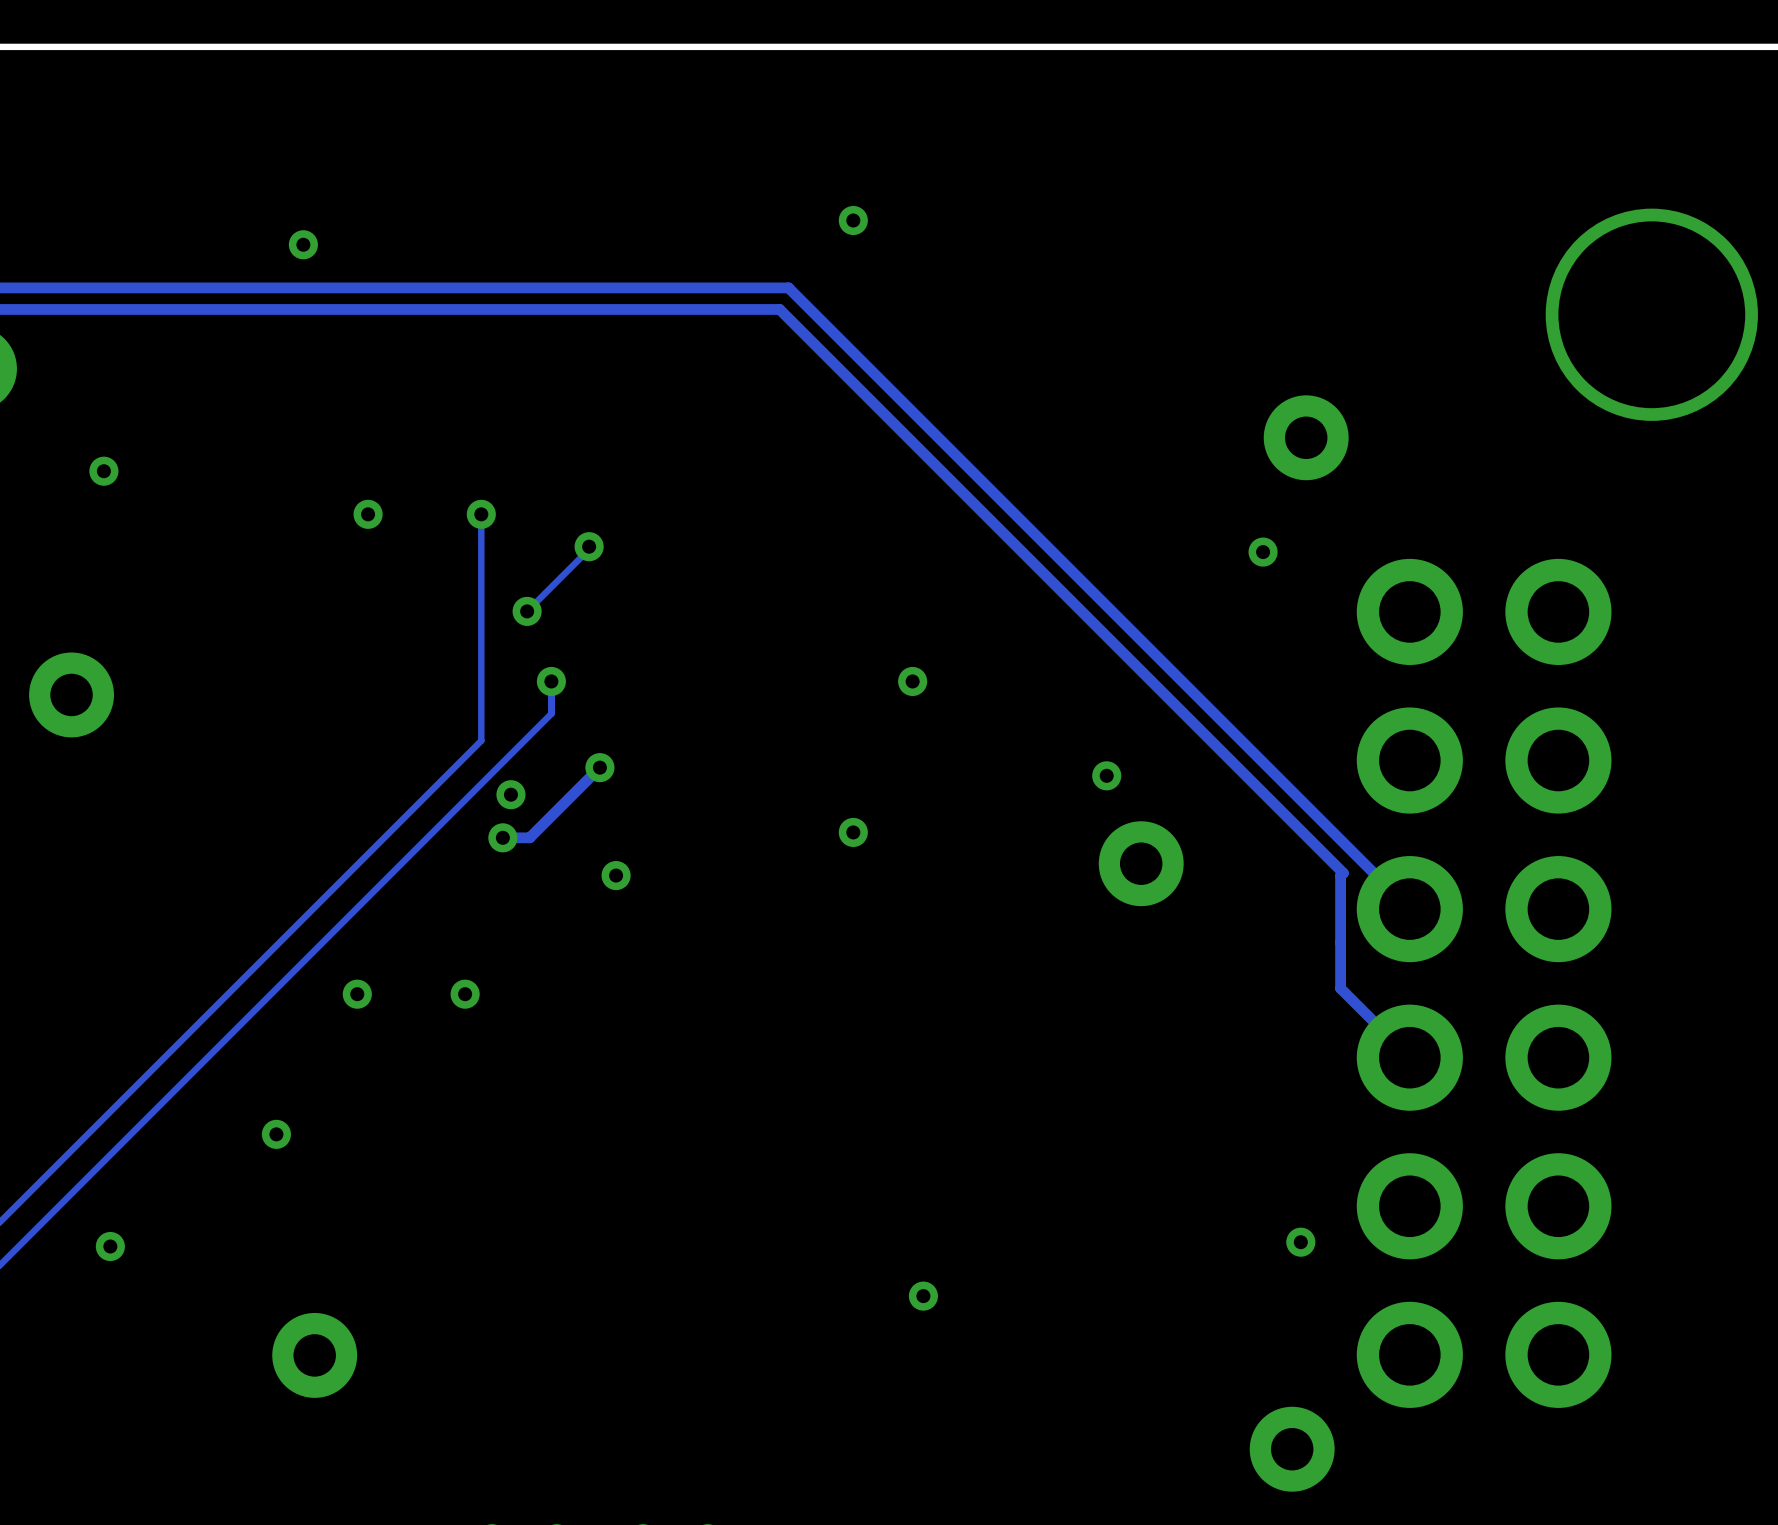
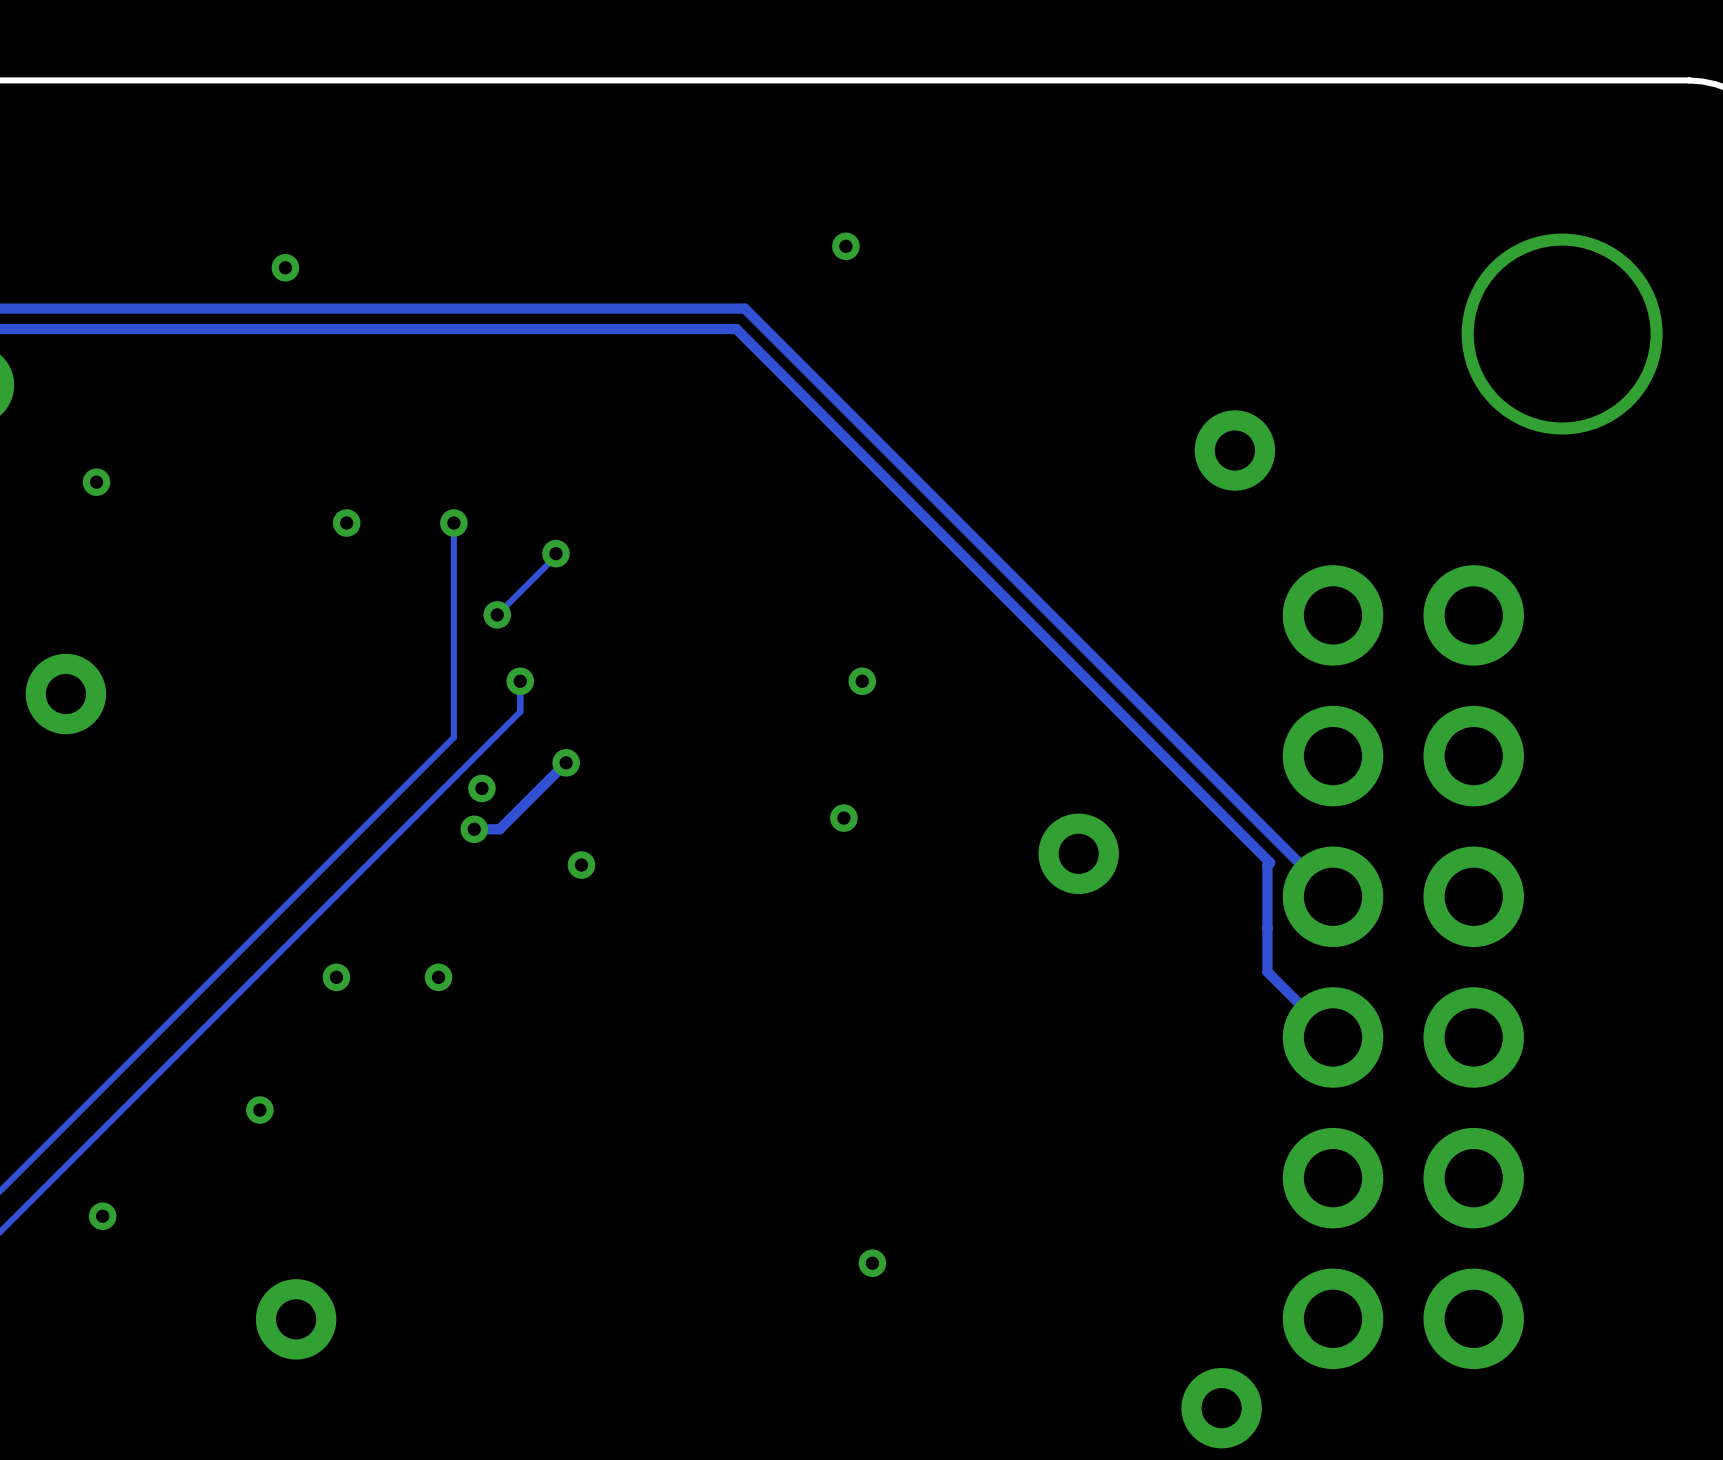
via position: (853, 220) -> (845, 246)
via: (1263, 552) -> none
via: (1106, 775) -> none
via position: (853, 832) -> (843, 818)
via: (1300, 1242) -> none

